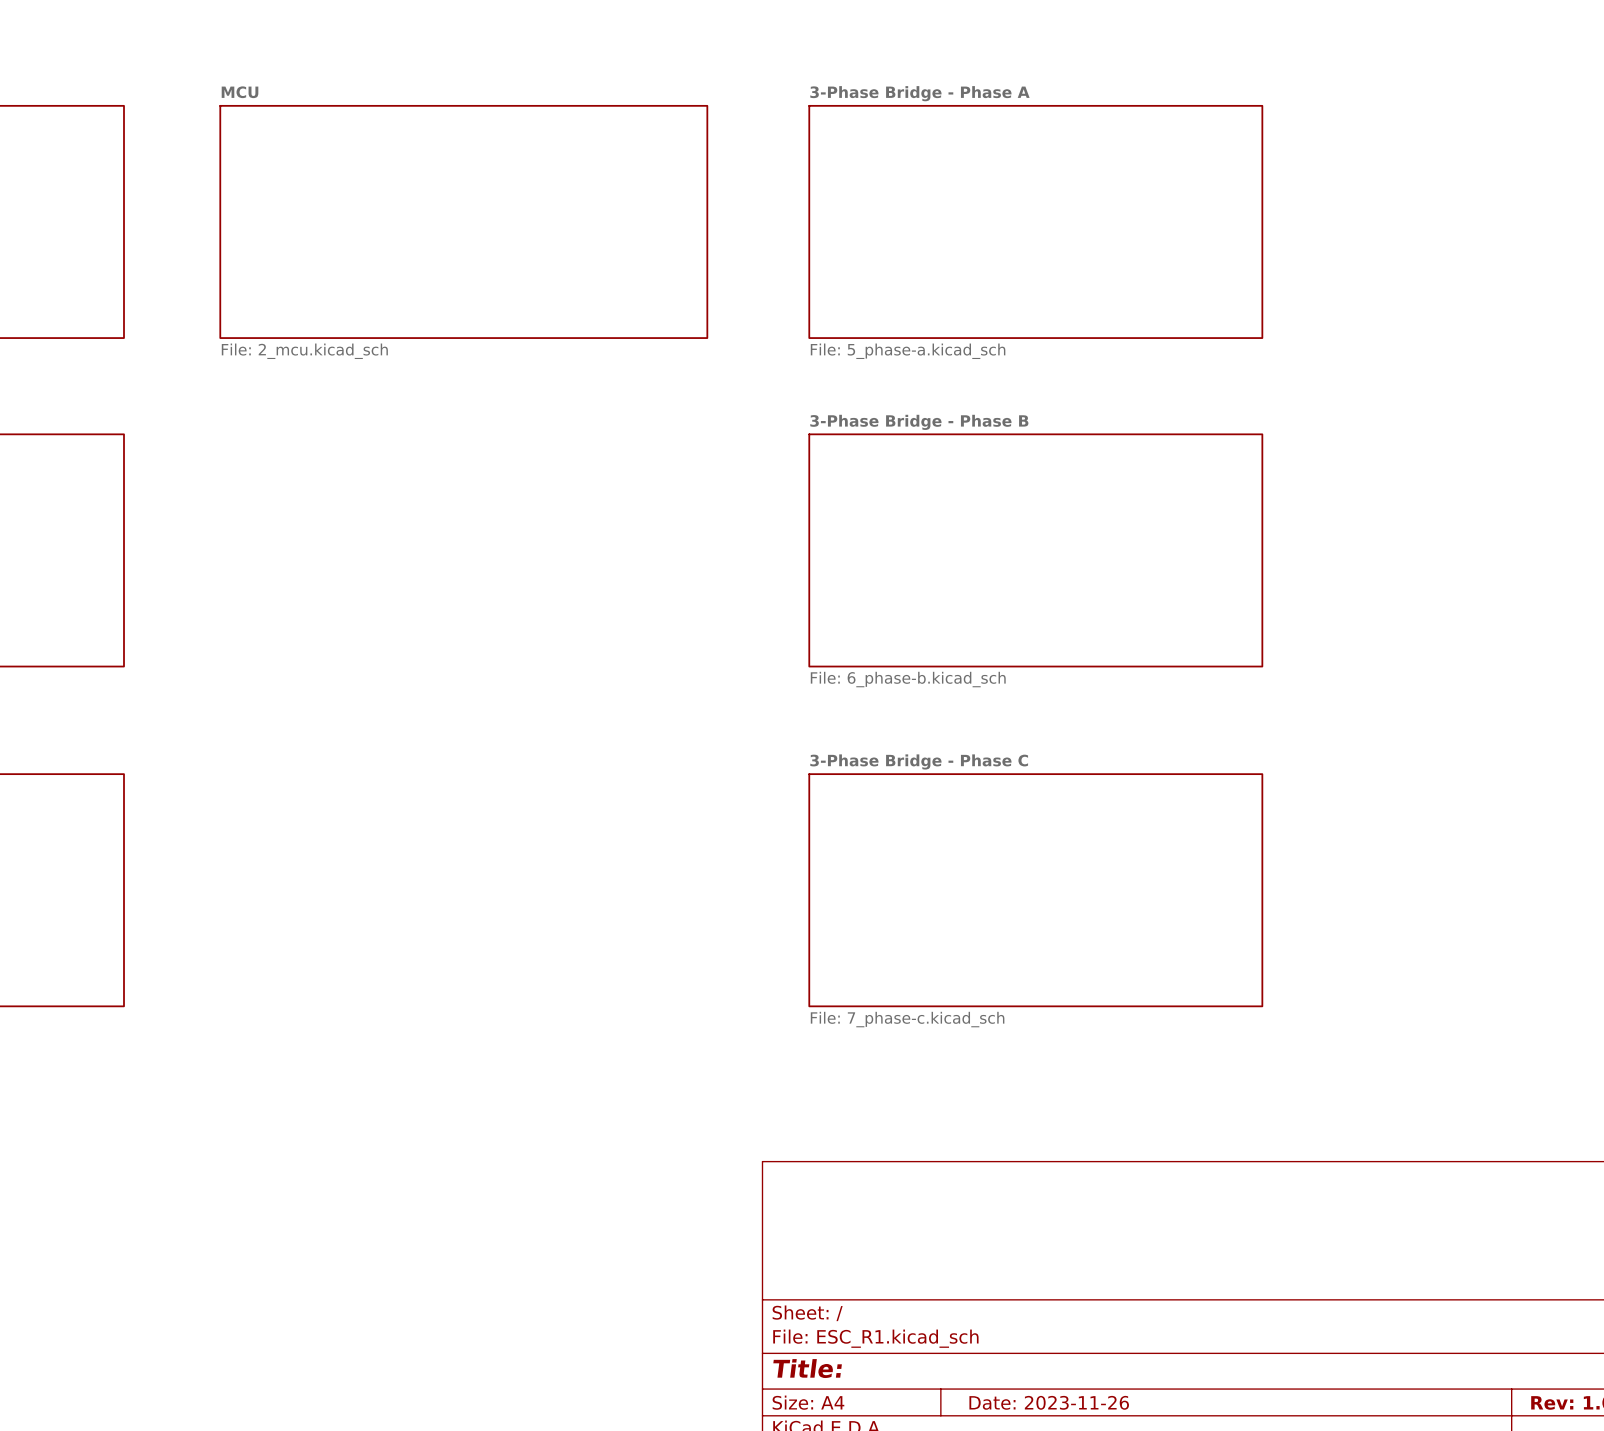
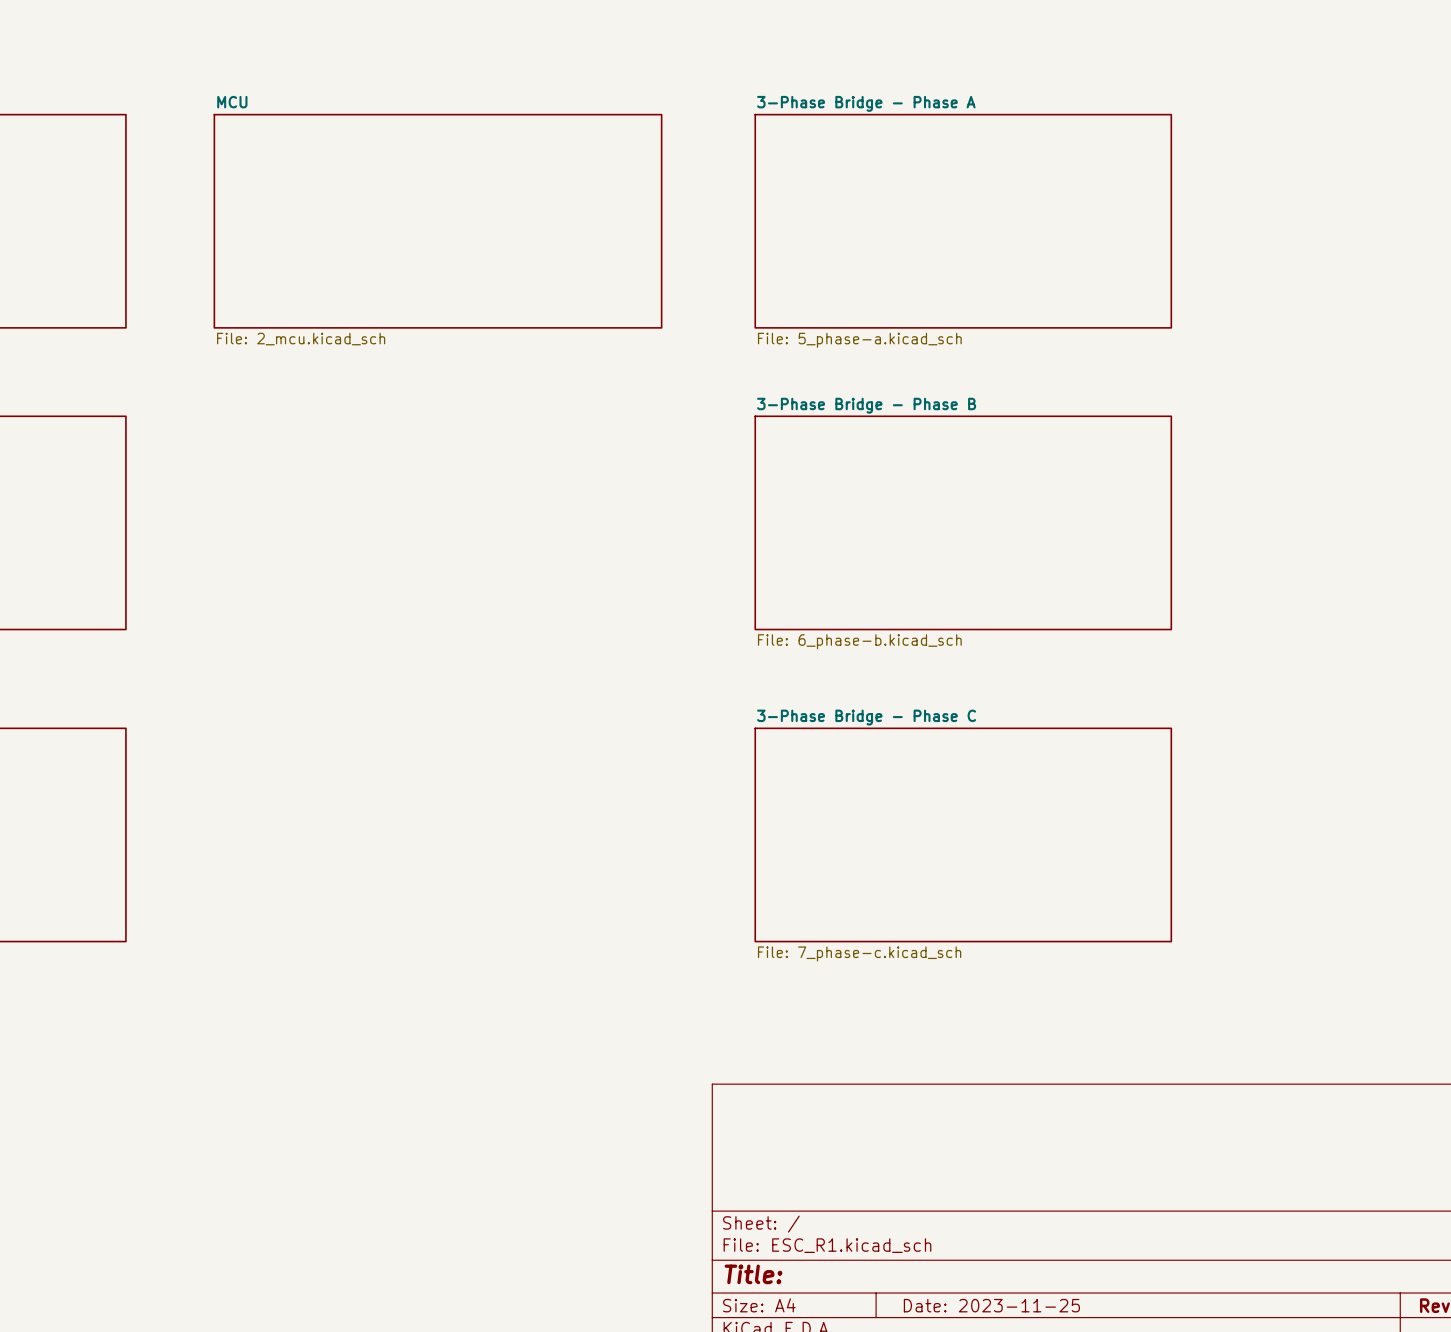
title block: Date: 2023-11-26 (1049, 1402) -> Date: 2023-11-25 (991, 1305)

